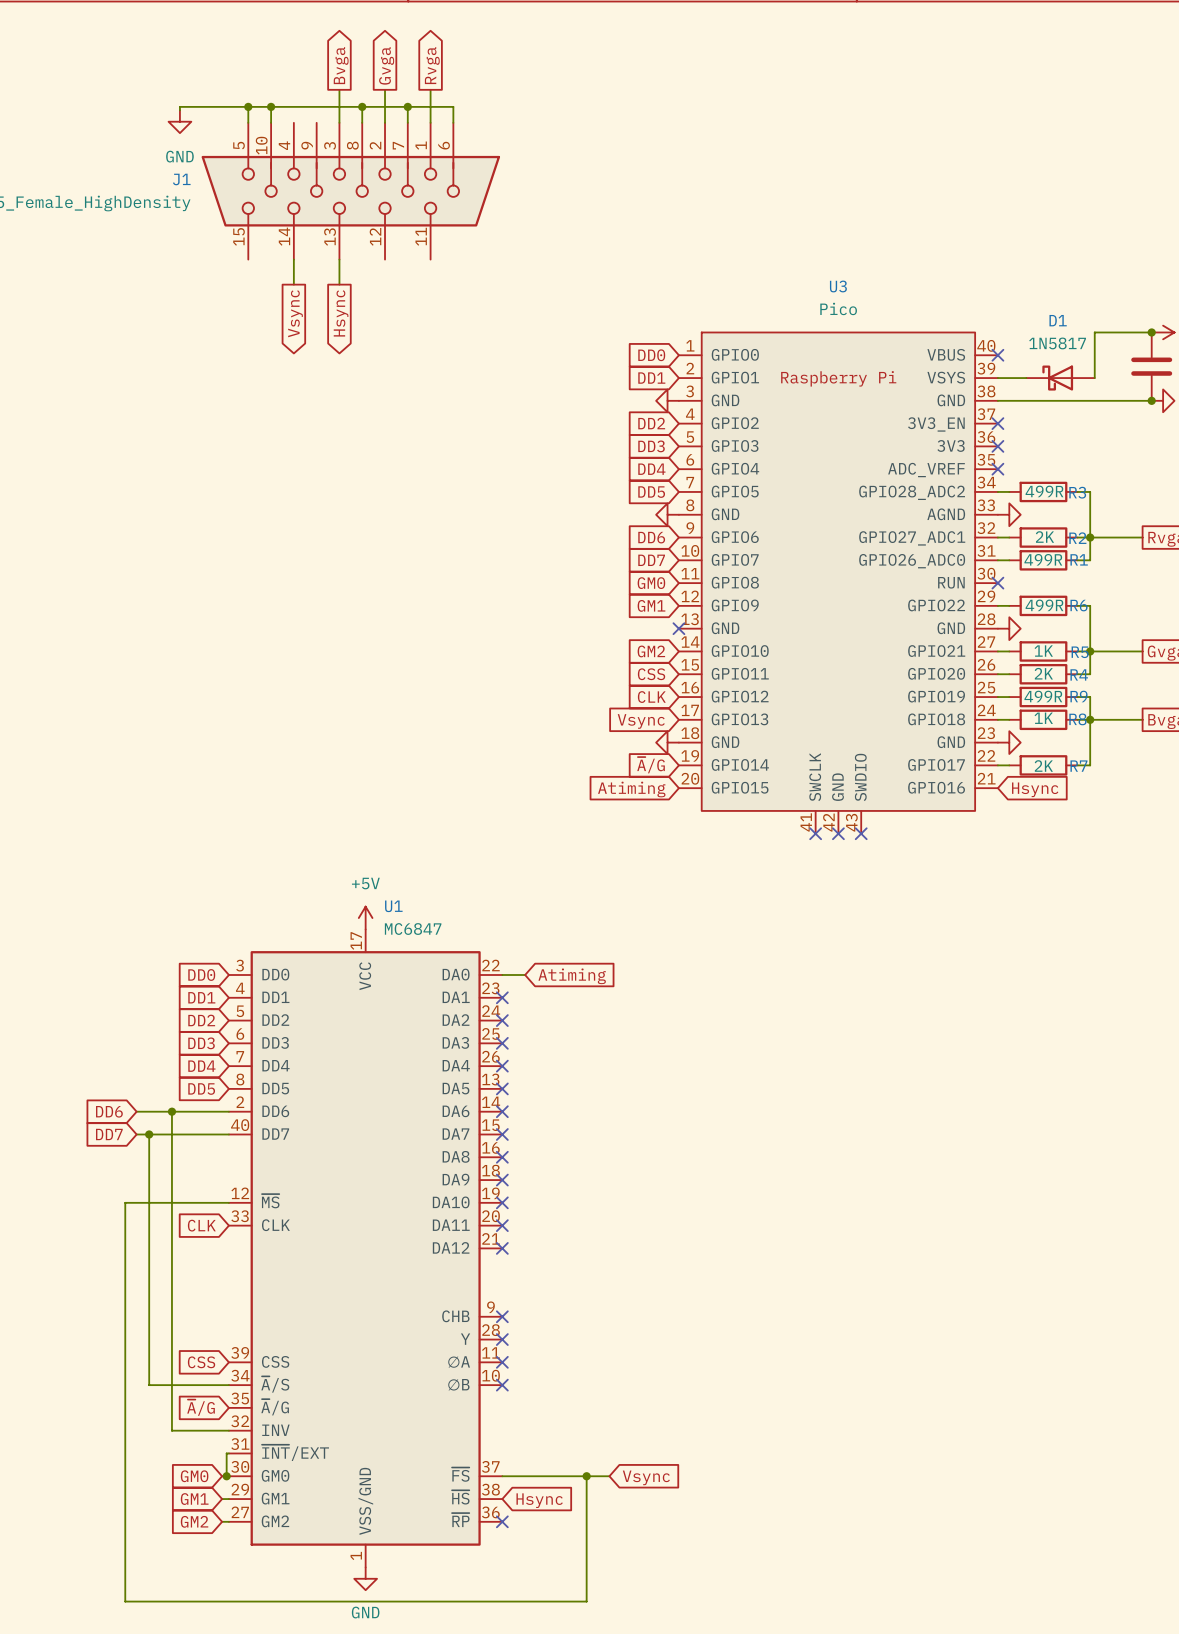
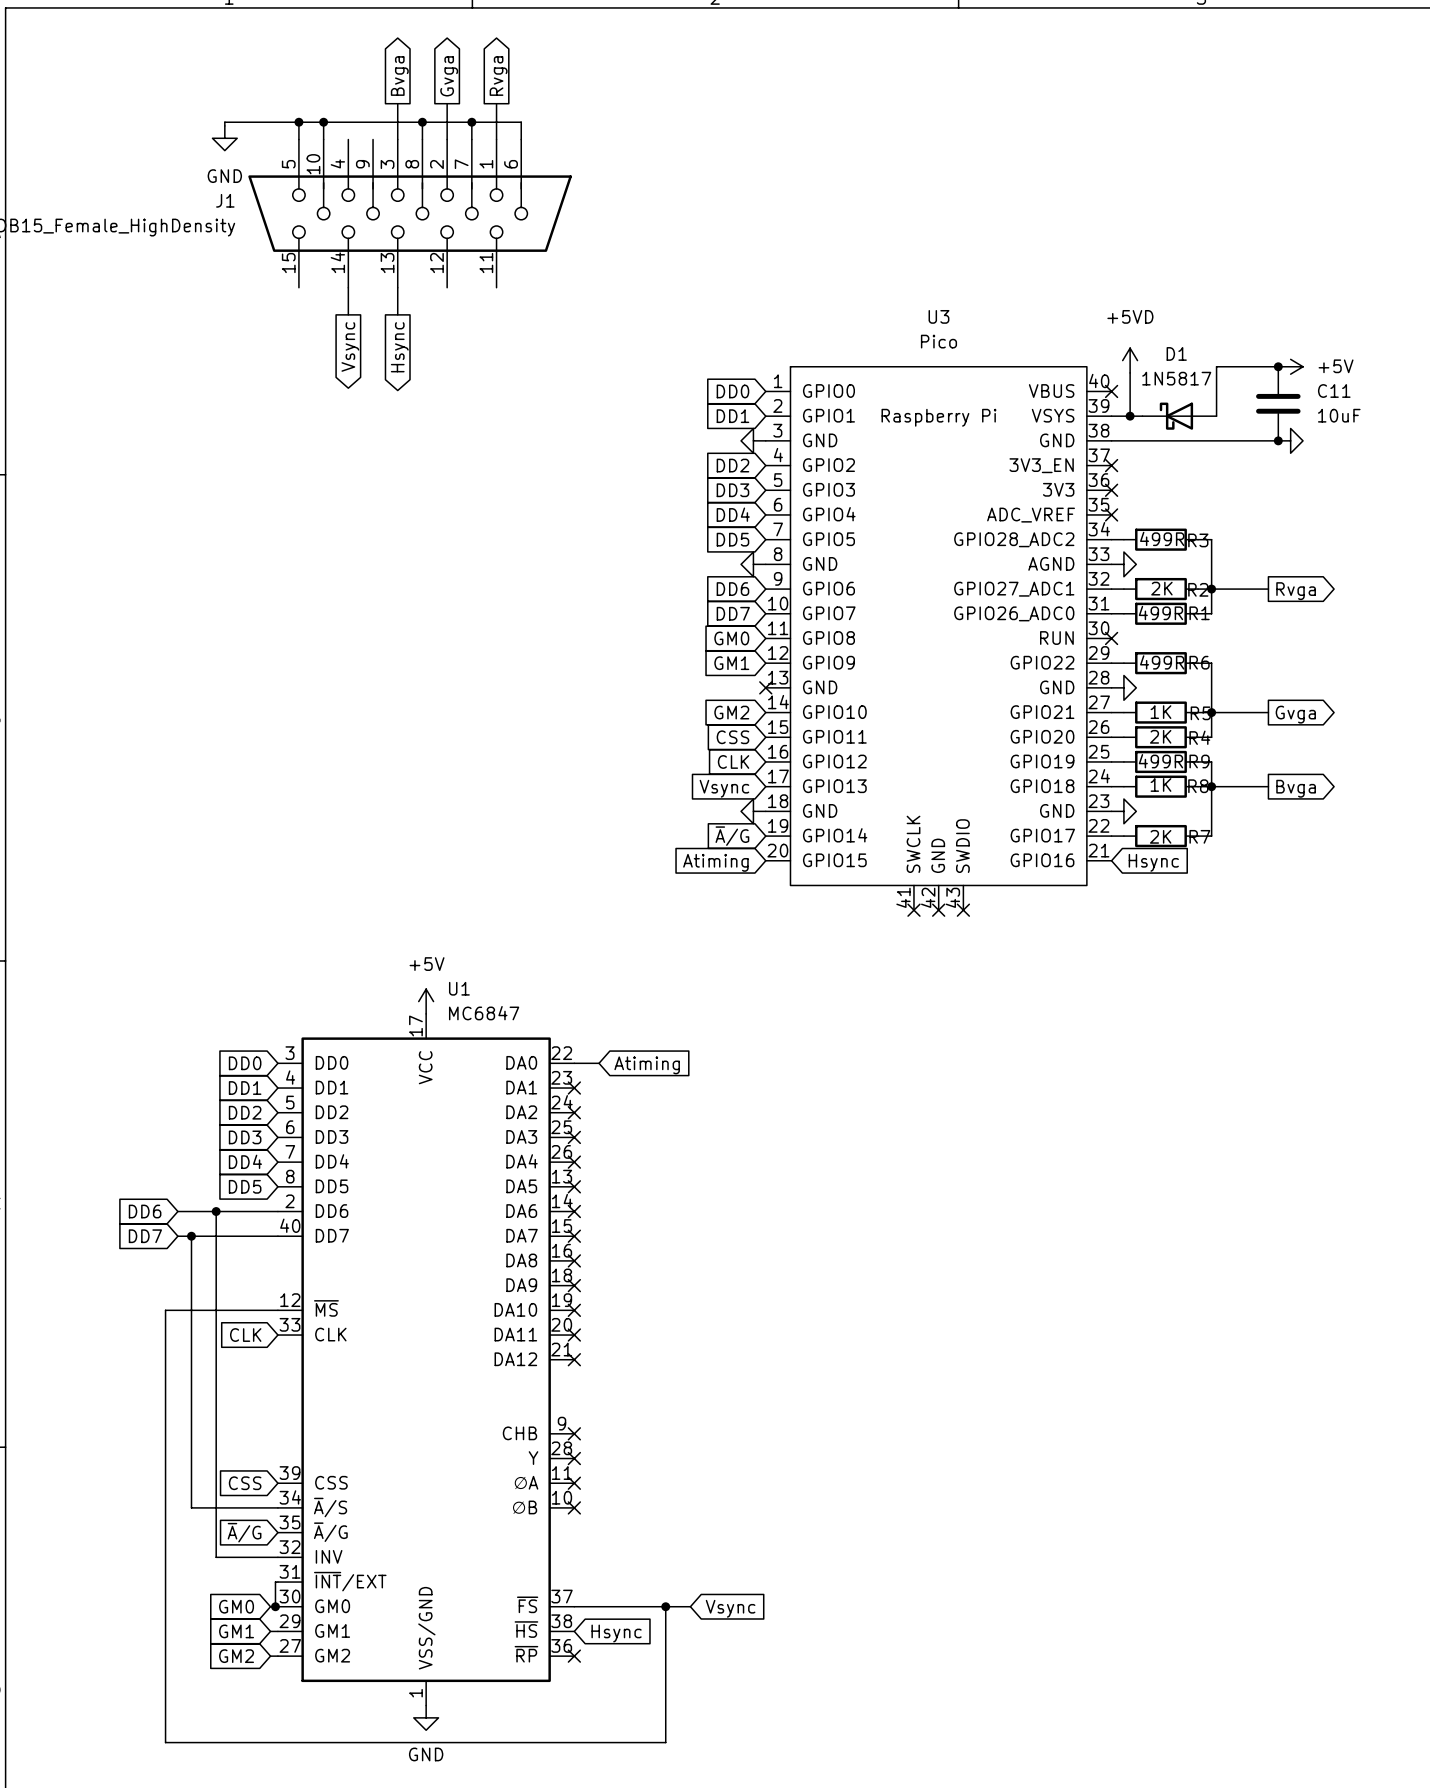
power symbol: none -> +5VD (1130, 360)
wire: none -> (1130, 372) (1130, 416)
junction: none -> (1130, 416)

